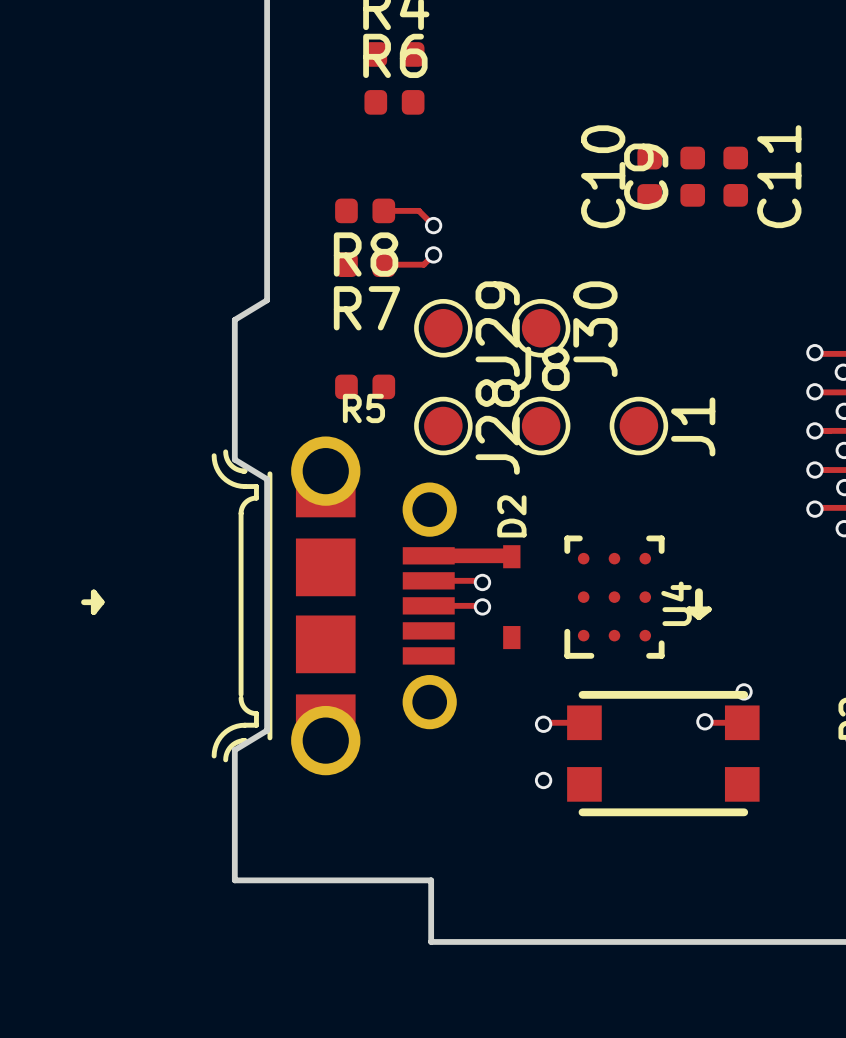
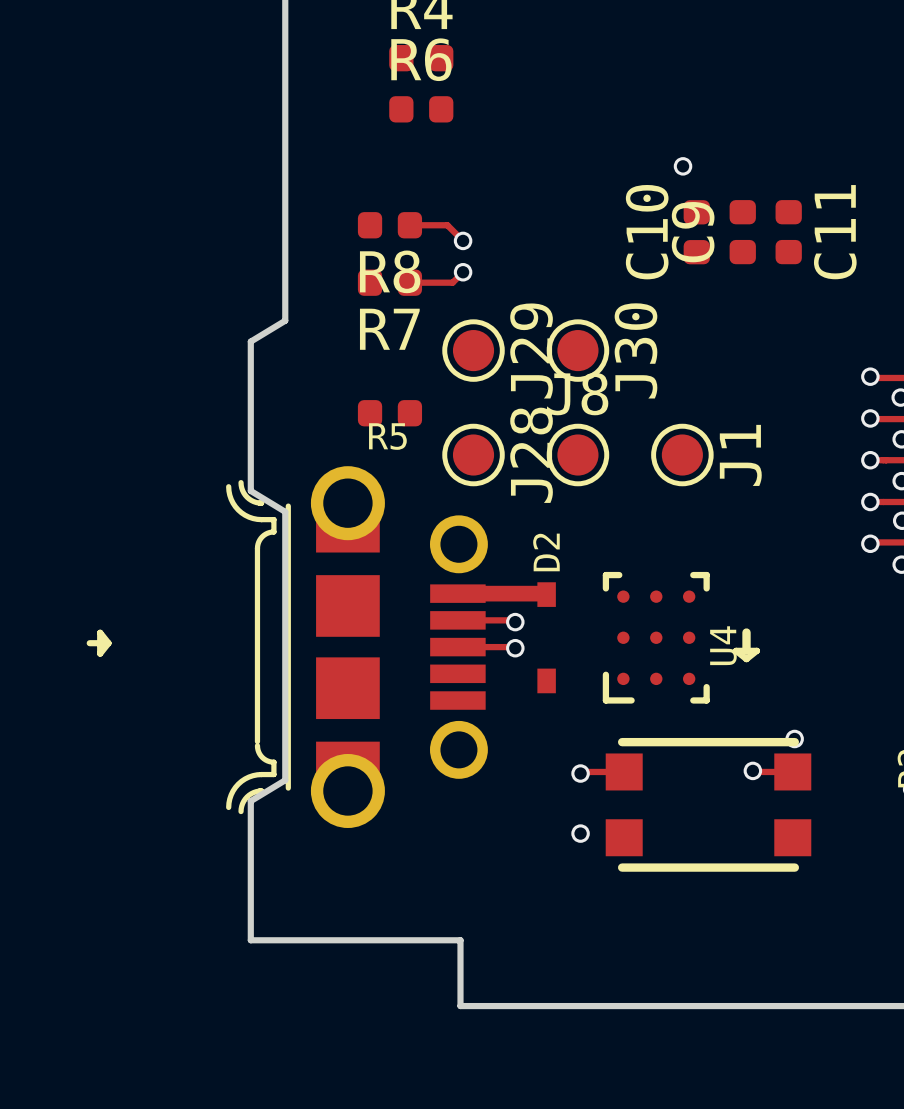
via: none -> (683, 166)
C10 position: (649, 176) -> (696, 232)
C9 position: (692, 176) -> (742, 232)
C11 position: (735, 176) -> (788, 232)

